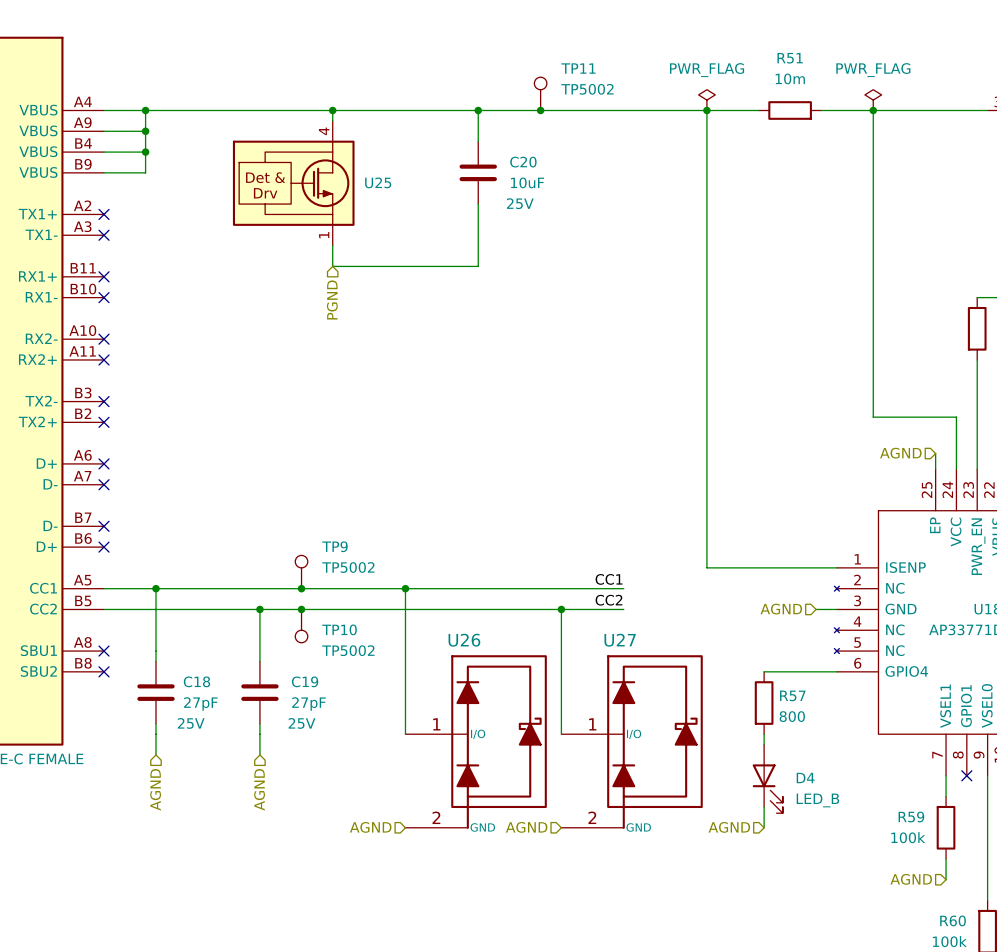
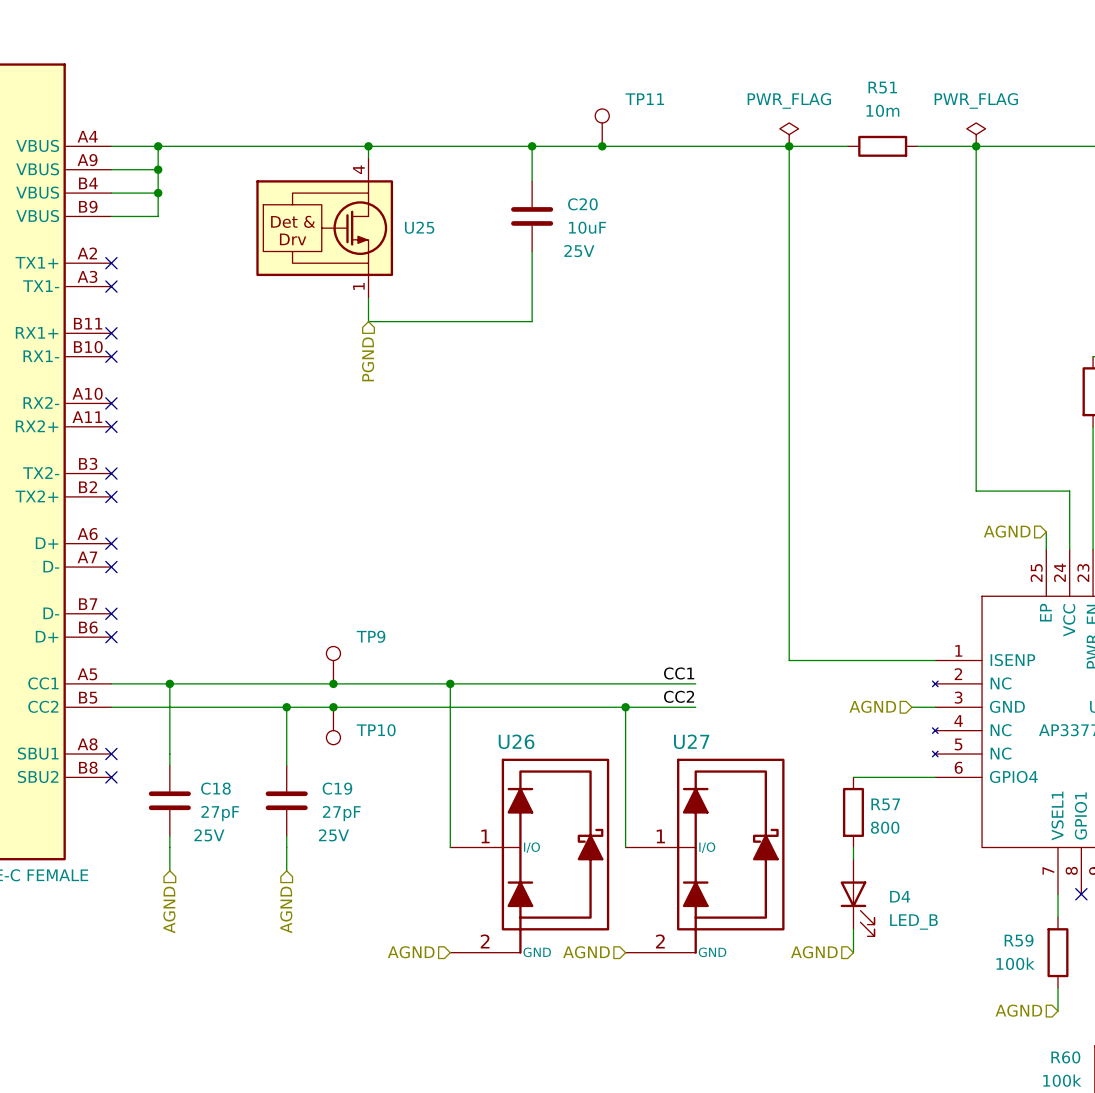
TP11 value: TP5002 (587, 89) -> none
TP9 value: TP5002 (348, 567) -> none
TP10 value: TP5002 (348, 650) -> none

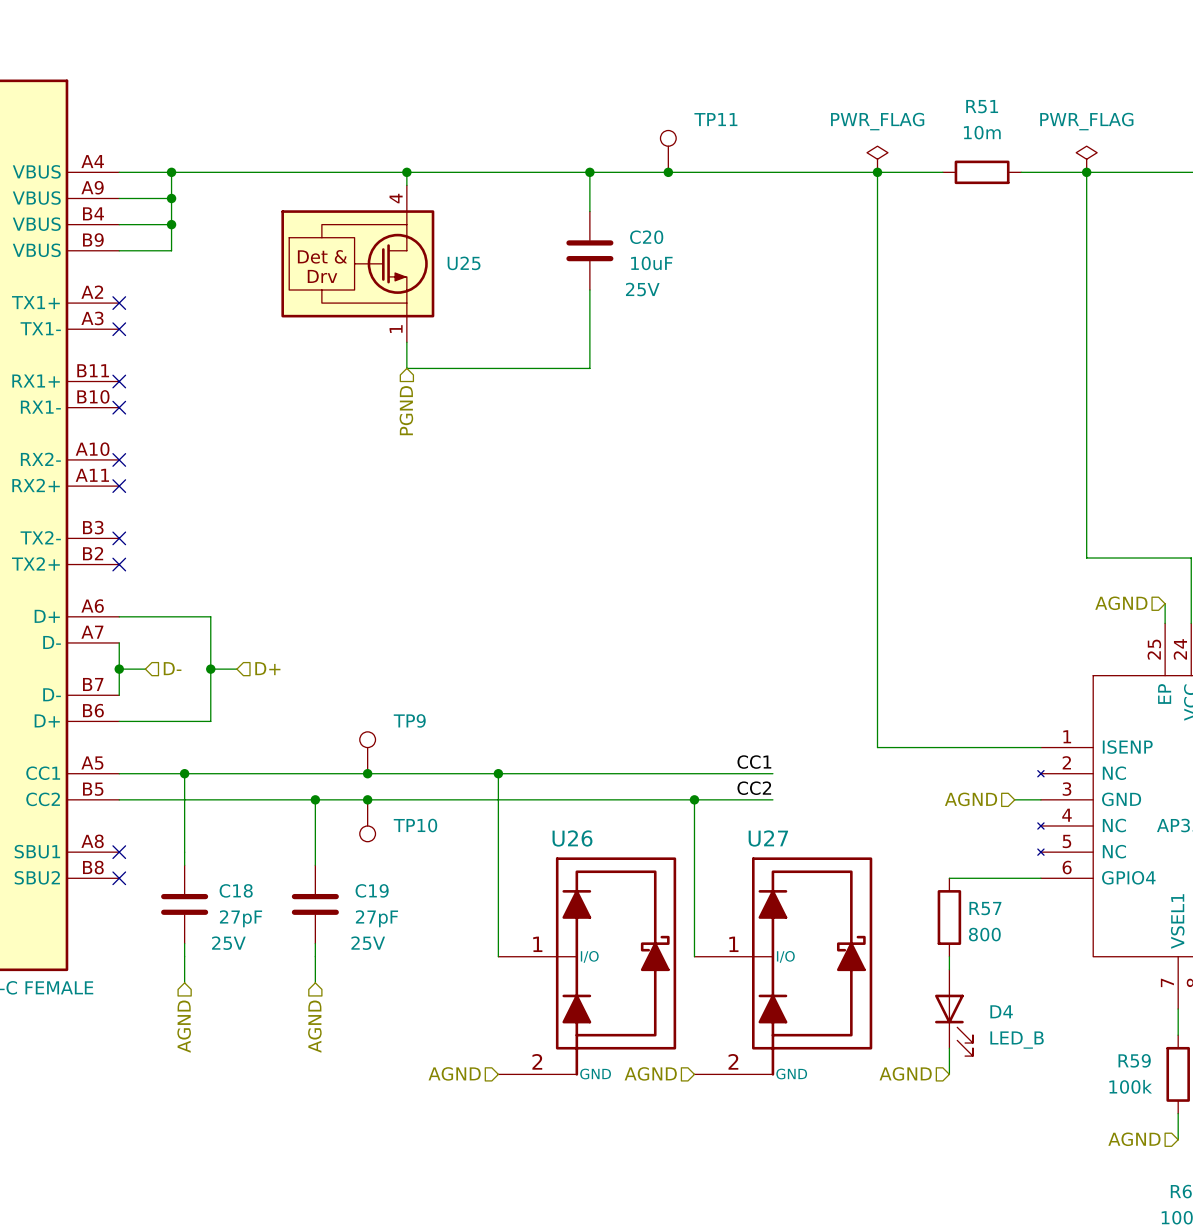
wire: none -> (119, 616) (210, 616) (210, 721) (119, 721)
no-connect mark: (111, 543) -> none
wire: none -> (119, 642) (119, 695)
no-connect mark: (111, 567) -> none
hierarchical label: none -> D- (172, 668)
hierarchical label: none -> D+ (267, 668)
wire: none -> (119, 669) (145, 669)
junction: none -> (119, 669)
wire: none -> (210, 669) (236, 669)
junction: none -> (210, 669)
no-connect mark: (111, 613) -> none
no-connect mark: (111, 637) -> none

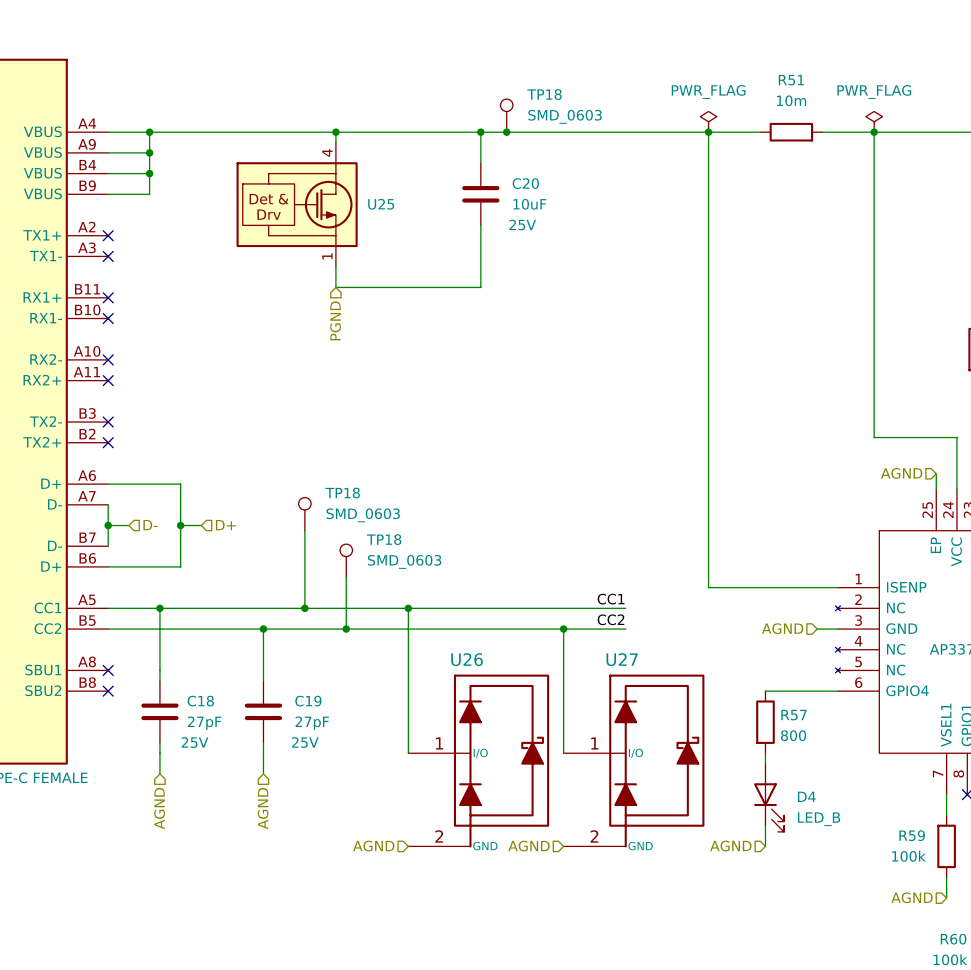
TP18: none -> SMD_0603 (506, 115)
TP11: (668, 151) -> none
junction position: (668, 172) -> (506, 132)
TP18: none -> SMD_0603 (304, 514)
wire: none -> (304, 530) (304, 608)
TP18: none -> SMD_0603 (346, 560)
wire: none -> (346, 577) (346, 629)
TP9: (367, 752) -> none
junction position: (367, 799) -> (346, 629)
TP10: (367, 820) -> none

